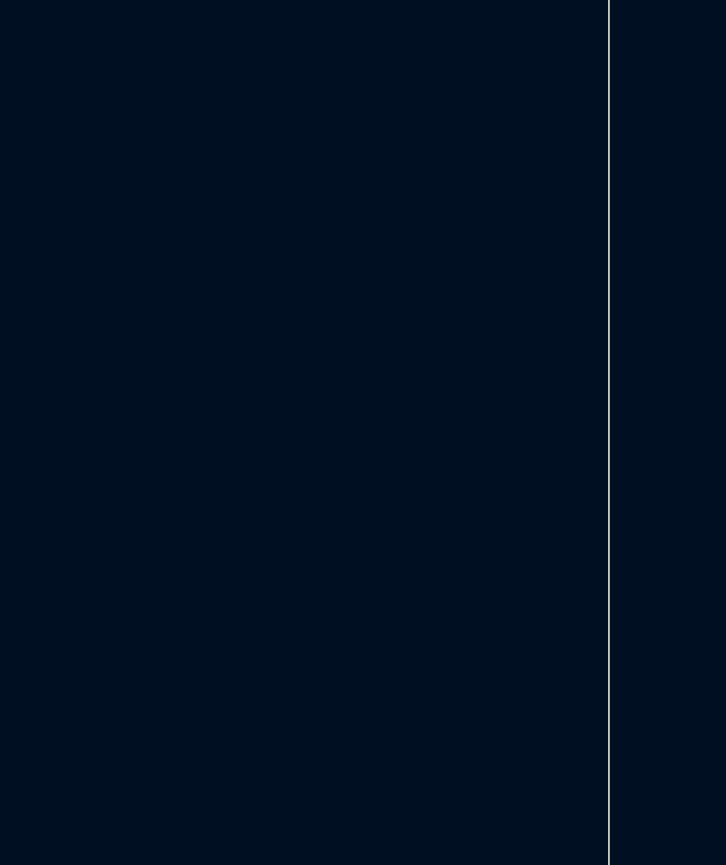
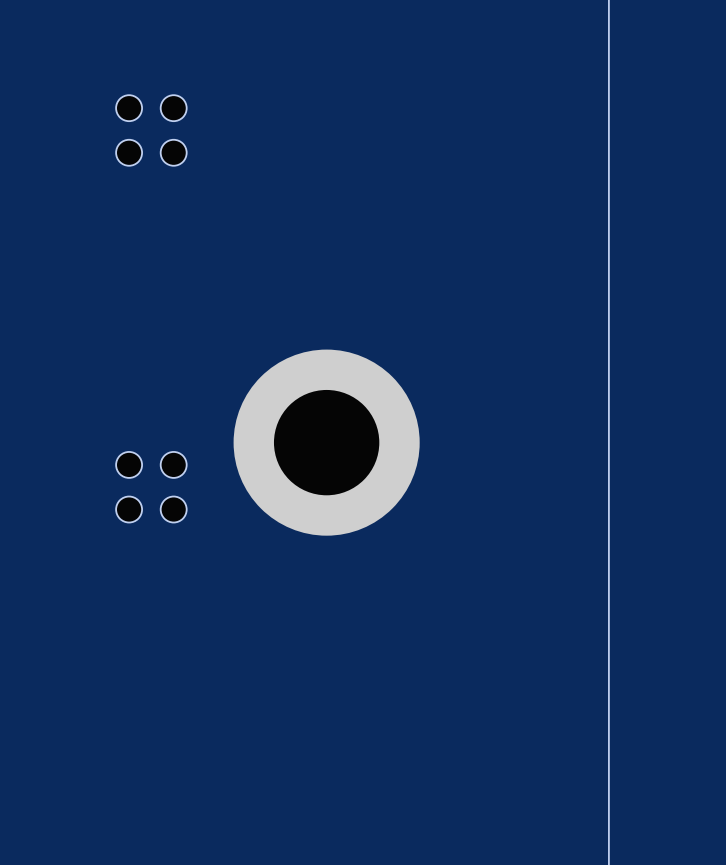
part: none -> (151, 130)
part: none -> (326, 442)
part: none -> (151, 487)

